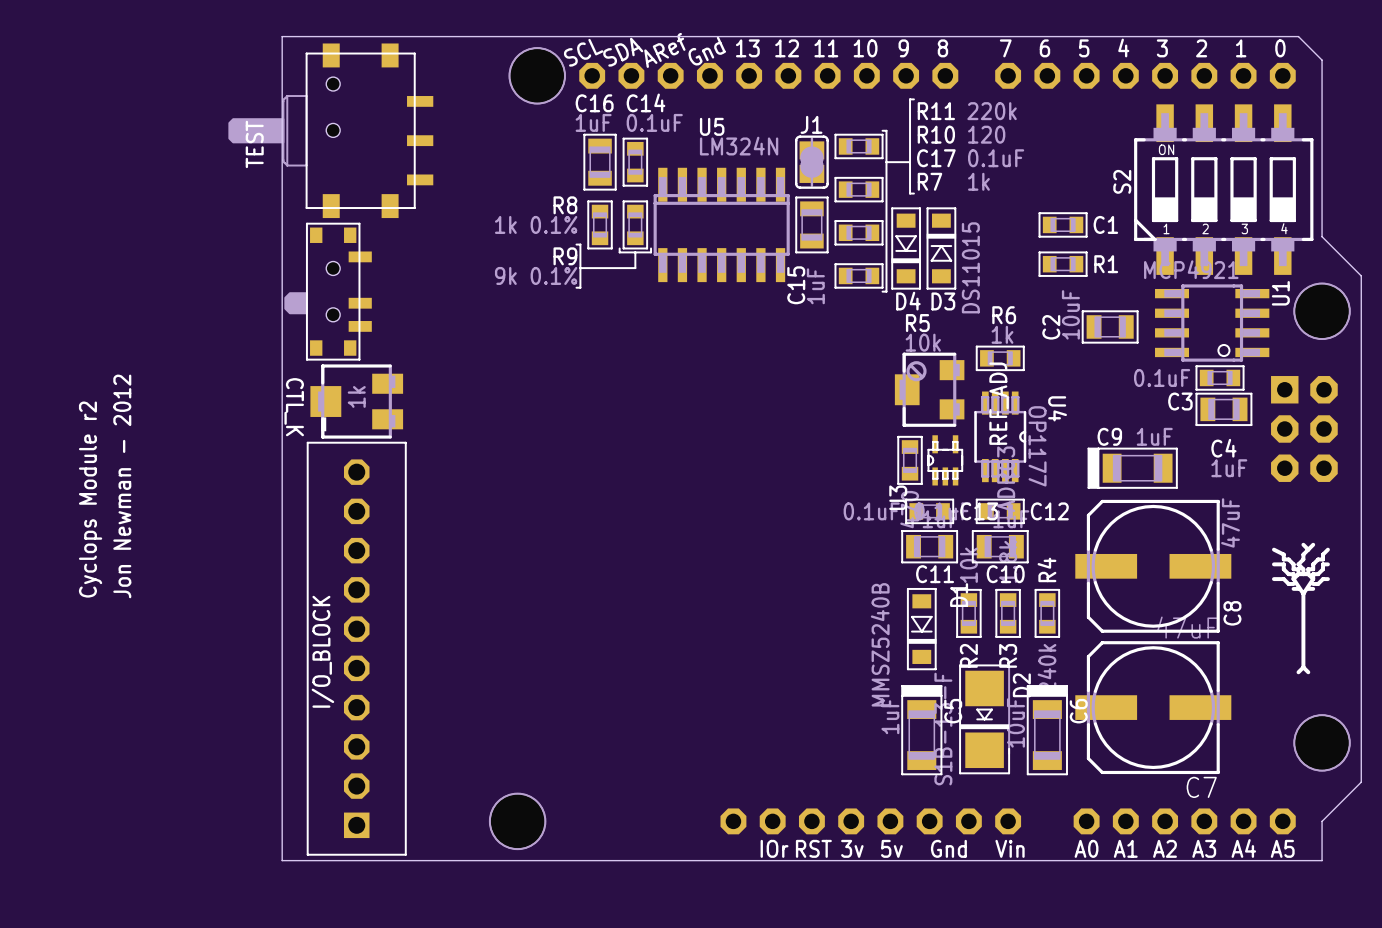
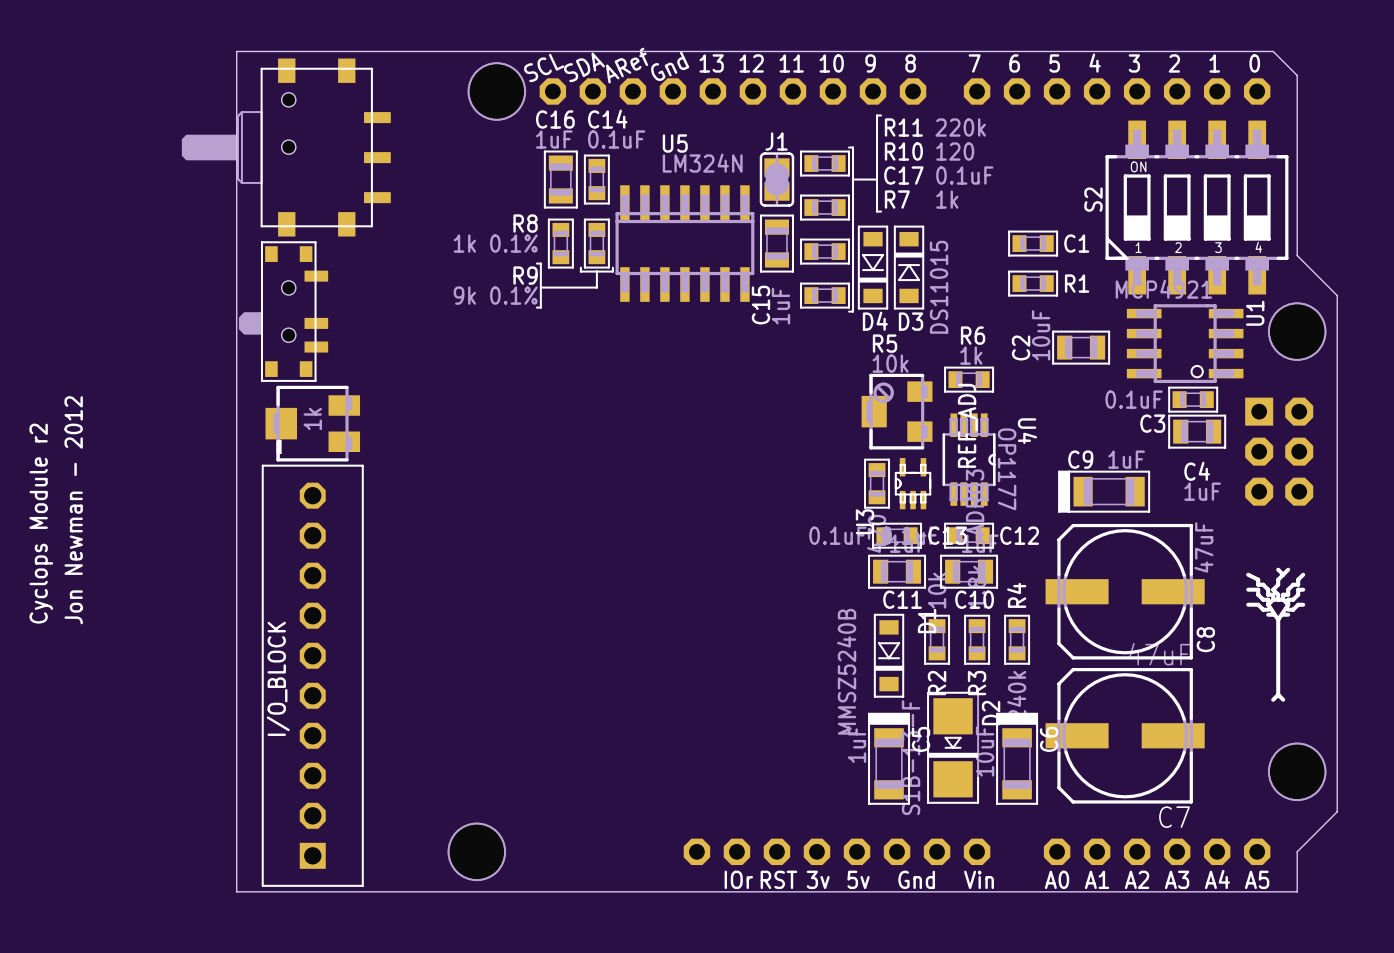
text: TEST (254, 144) -> none
CTL_K name: CTL_K (294, 407) -> none

